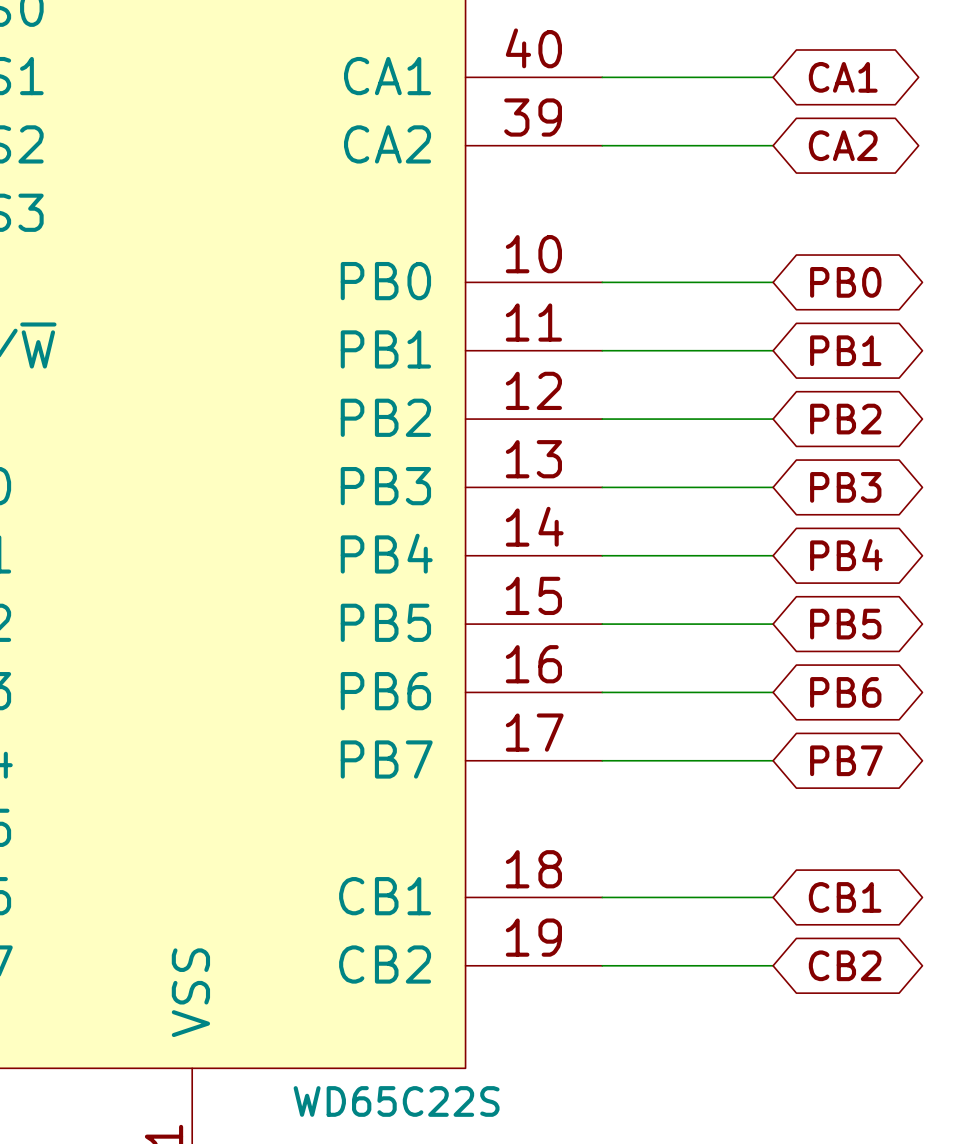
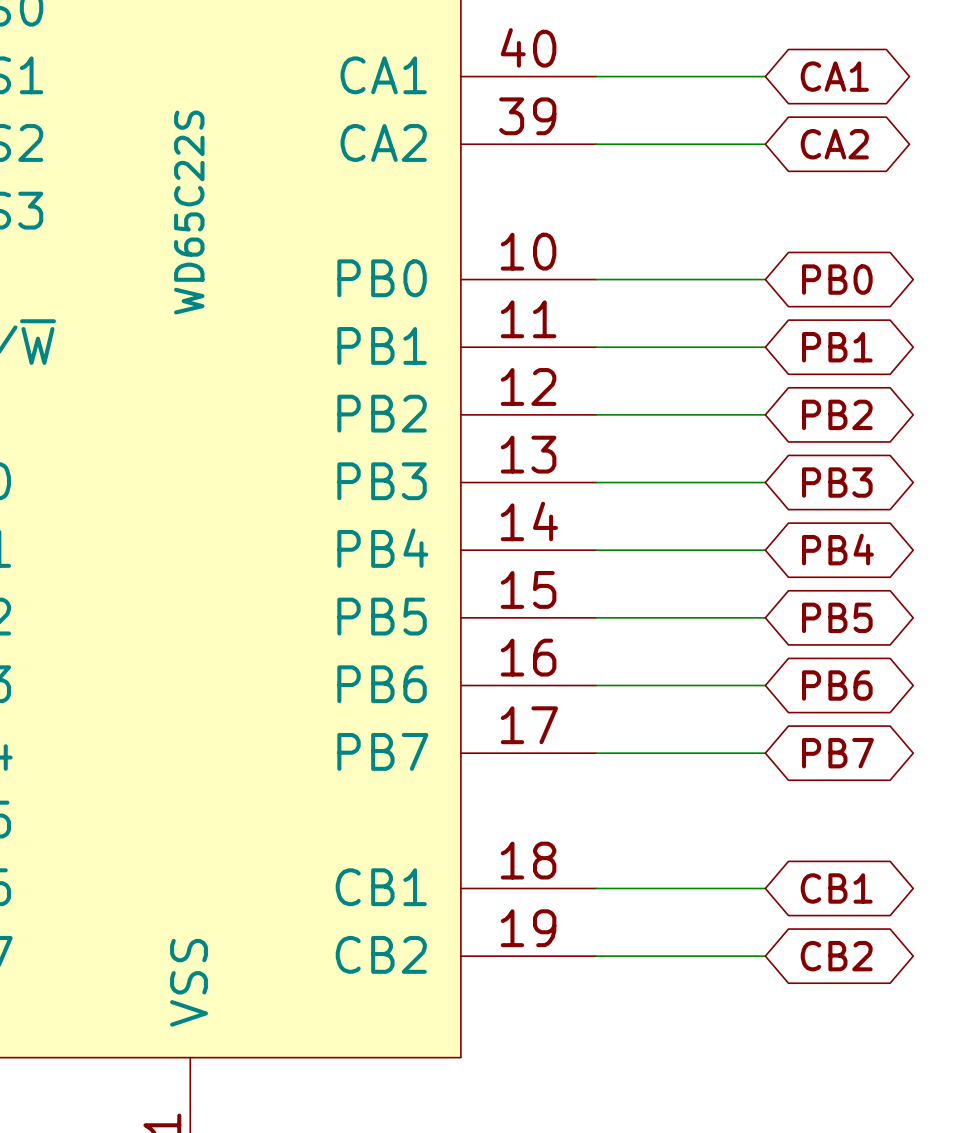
part value rotation: 0° (396, 1101) -> 90° counterclockwise (189, 212)
part value position: WD65C22S (396, 1101) -> WD65C22S (189, 212)

